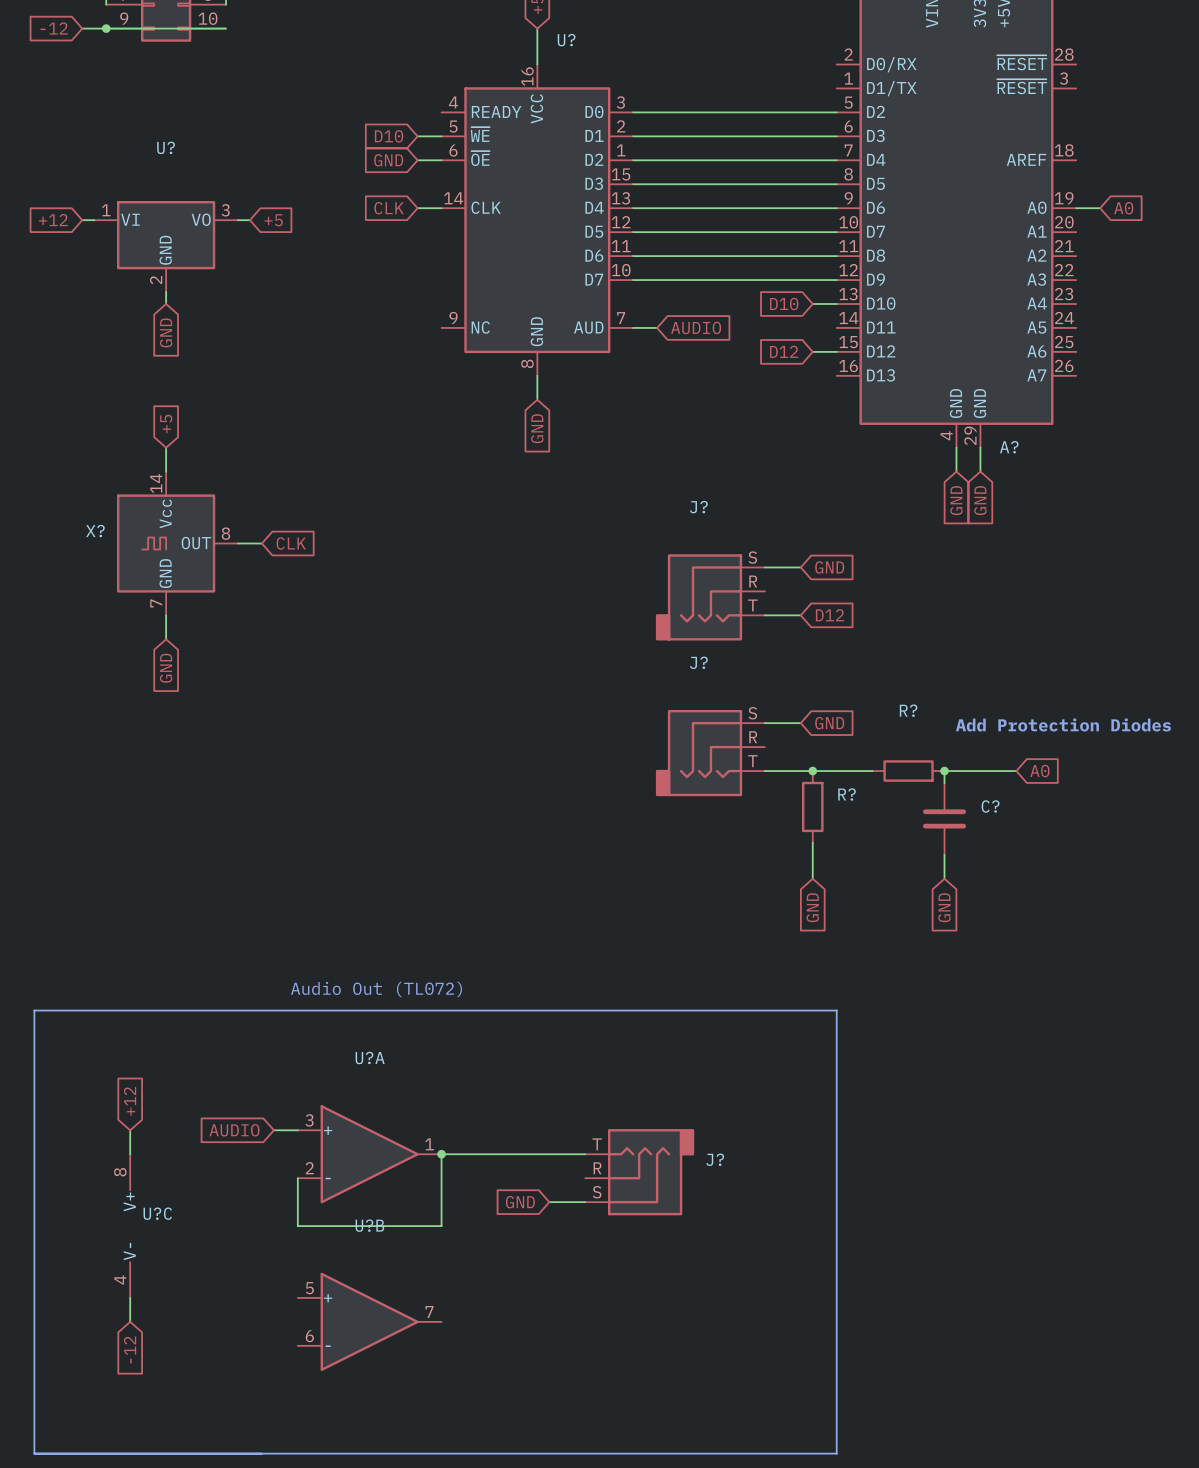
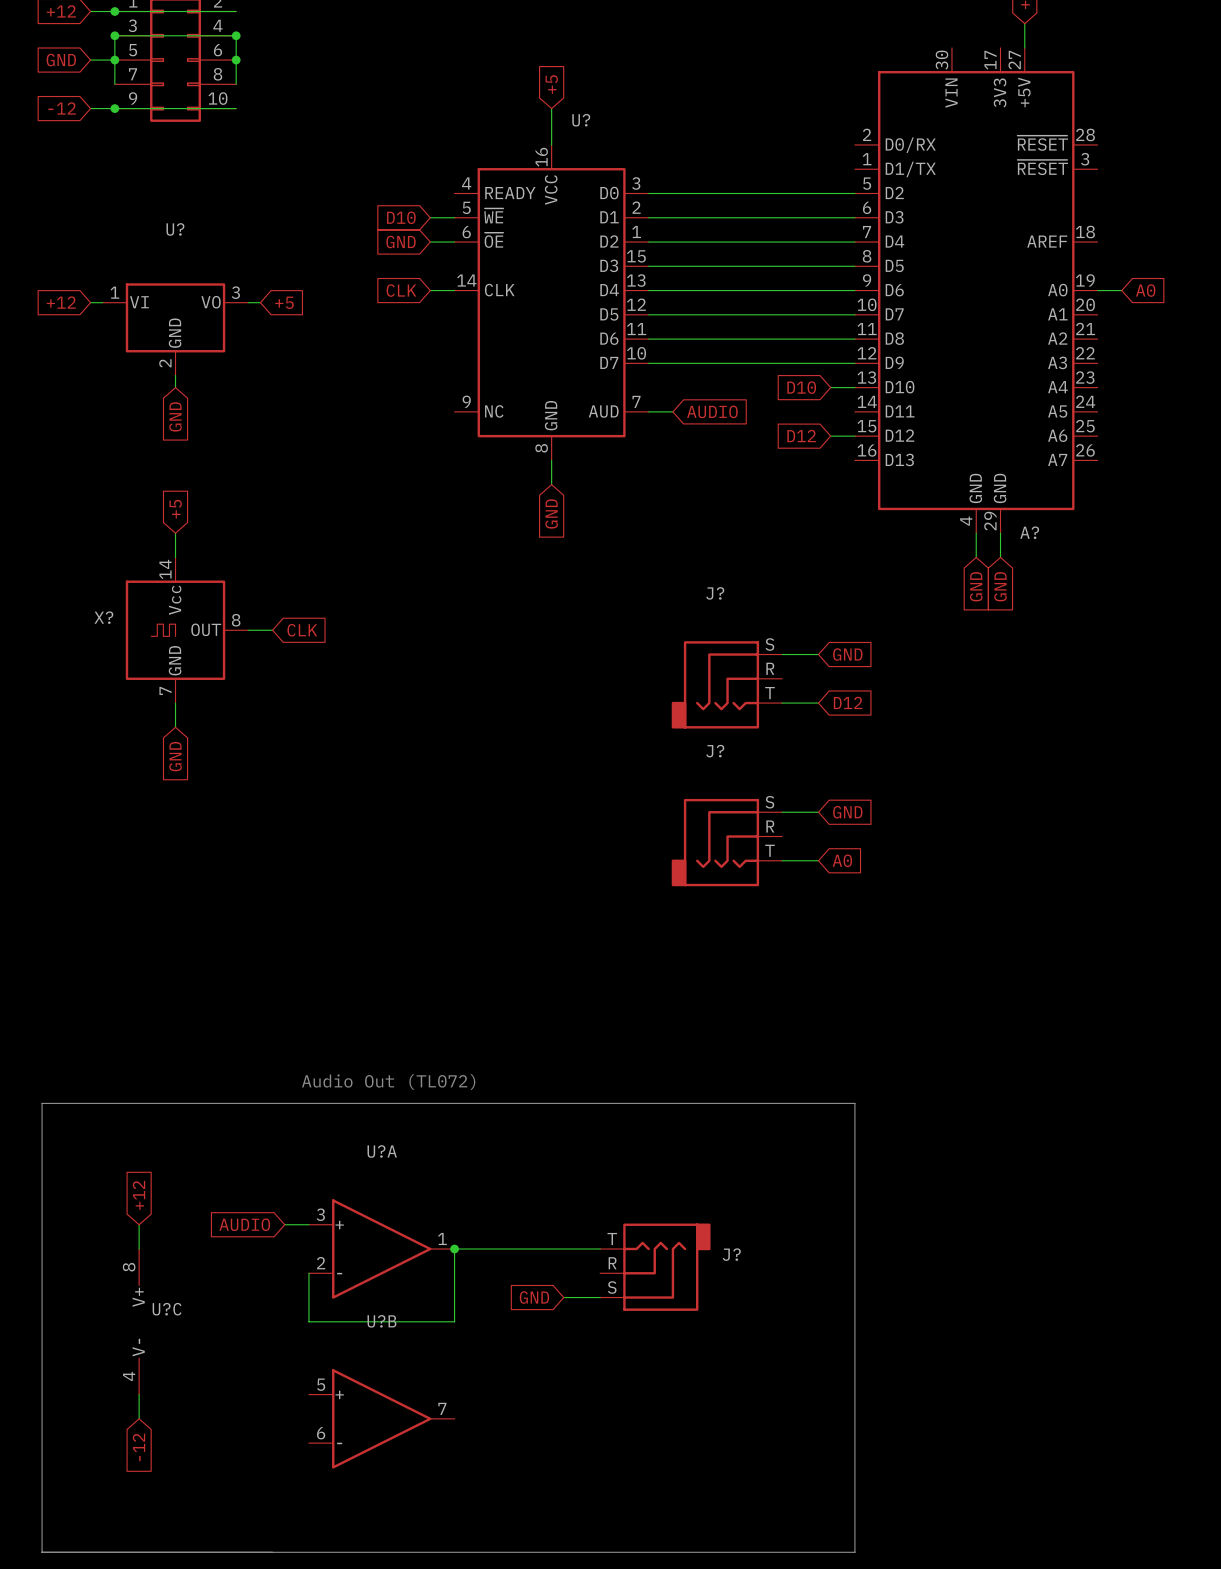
text: Add Protection Diodes (1063, 724) -> none
wire: (800, 771) (872, 771) -> none
junction: (812, 771) -> none
R?: (908, 771) -> none
junction: (944, 771) -> none
wire: (1016, 771) (944, 771) (944, 783) -> none
global label position: A0 (1039, 771) -> A0 (842, 860)
R?: (812, 806) -> none
C?: (944, 818) -> none
wire: (812, 842) (812, 878) -> none
wire: (944, 854) (944, 878) -> none
global label: GND (812, 907) -> none
global label: GND (944, 907) -> none

